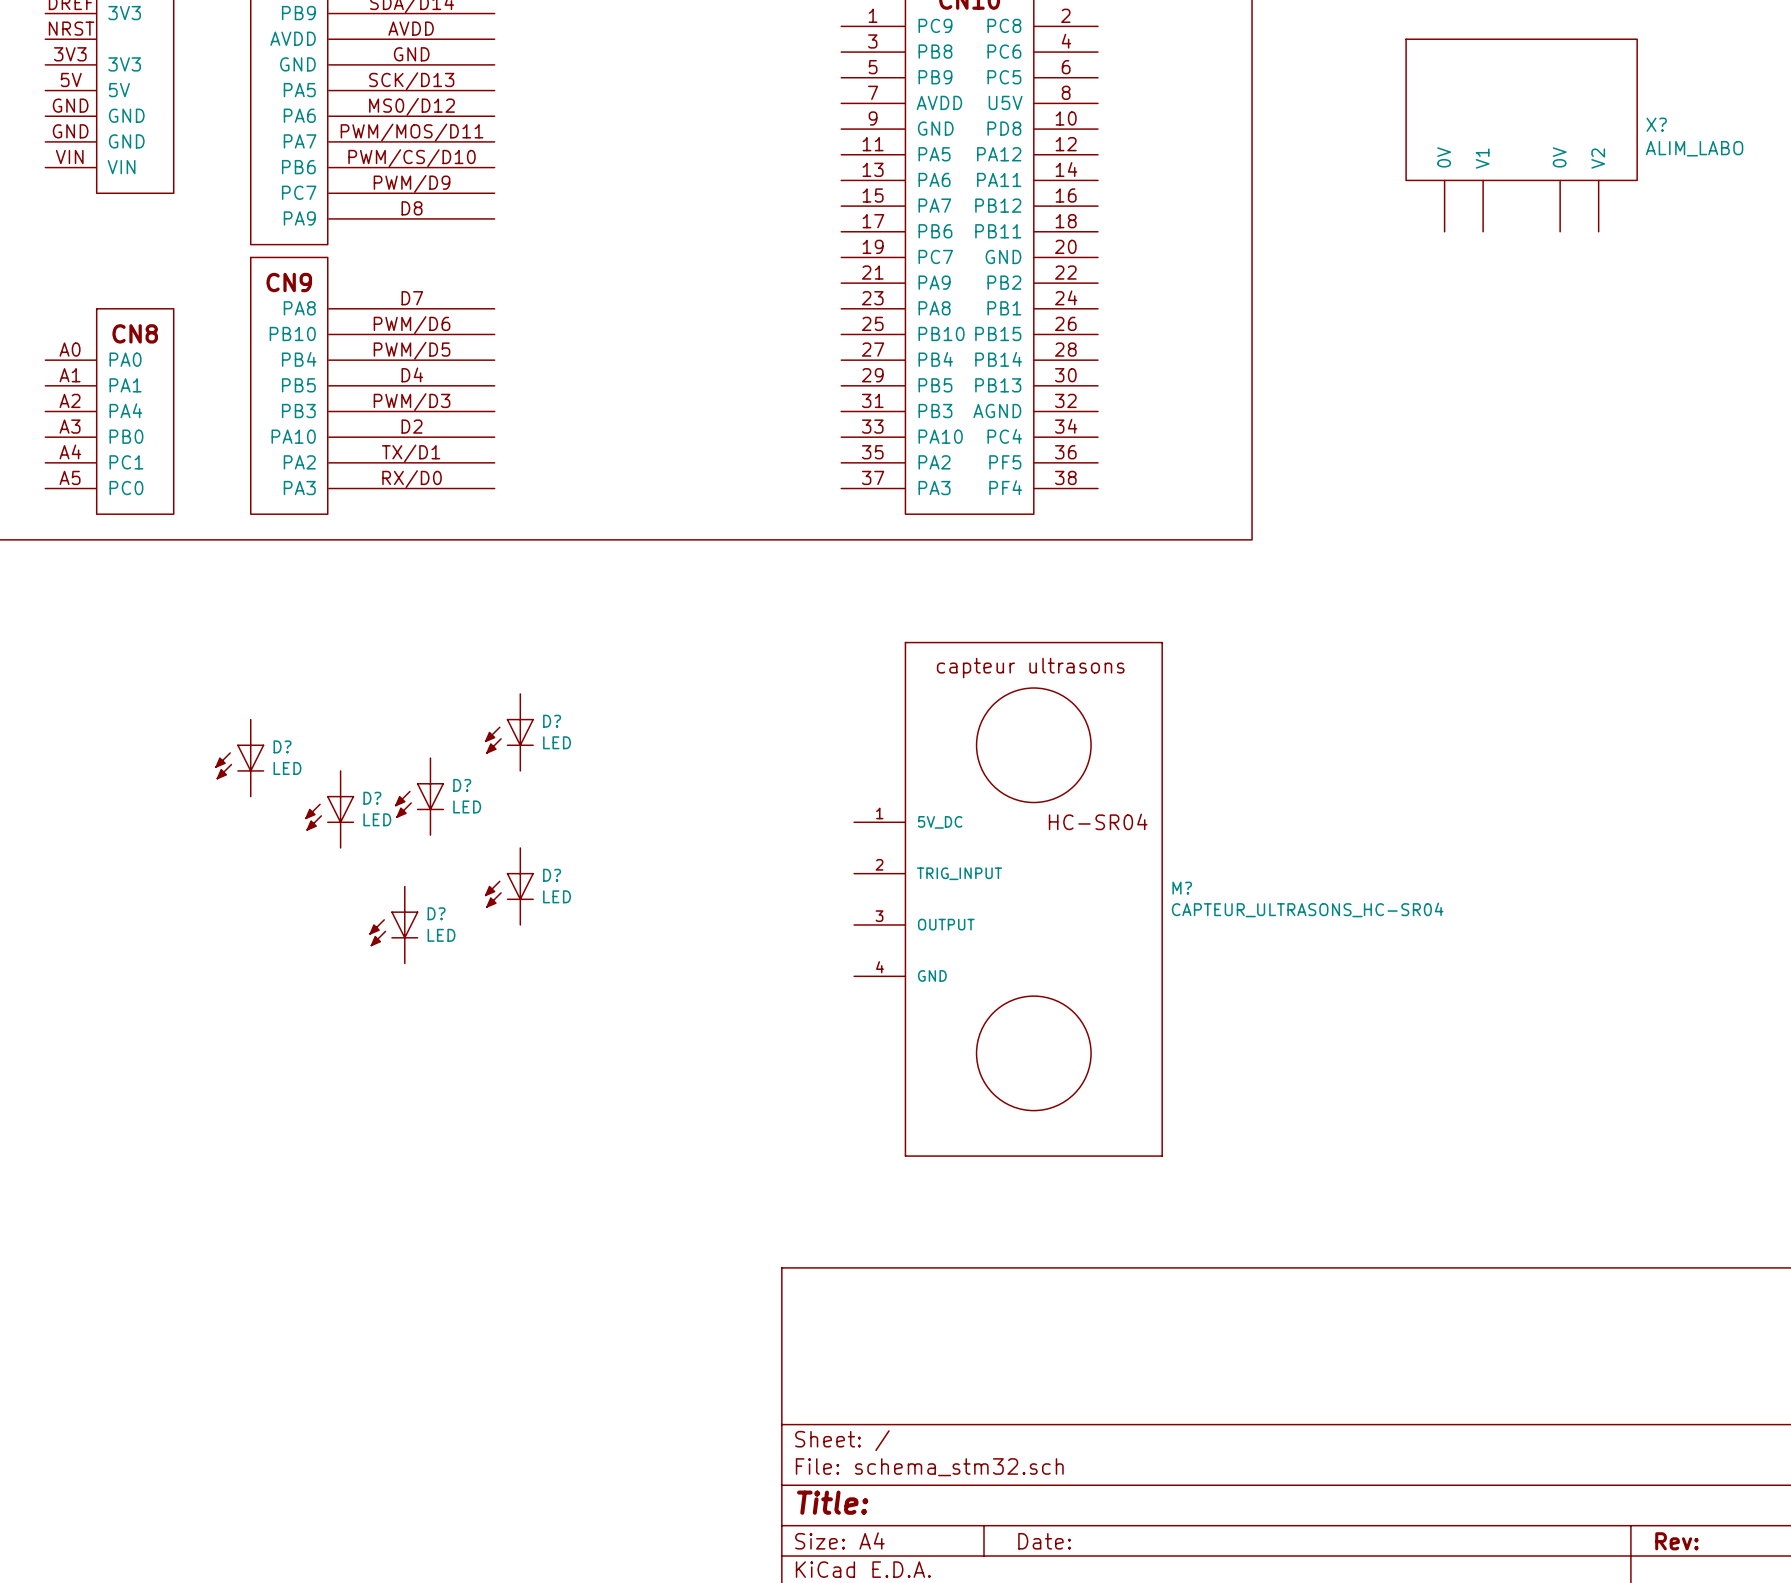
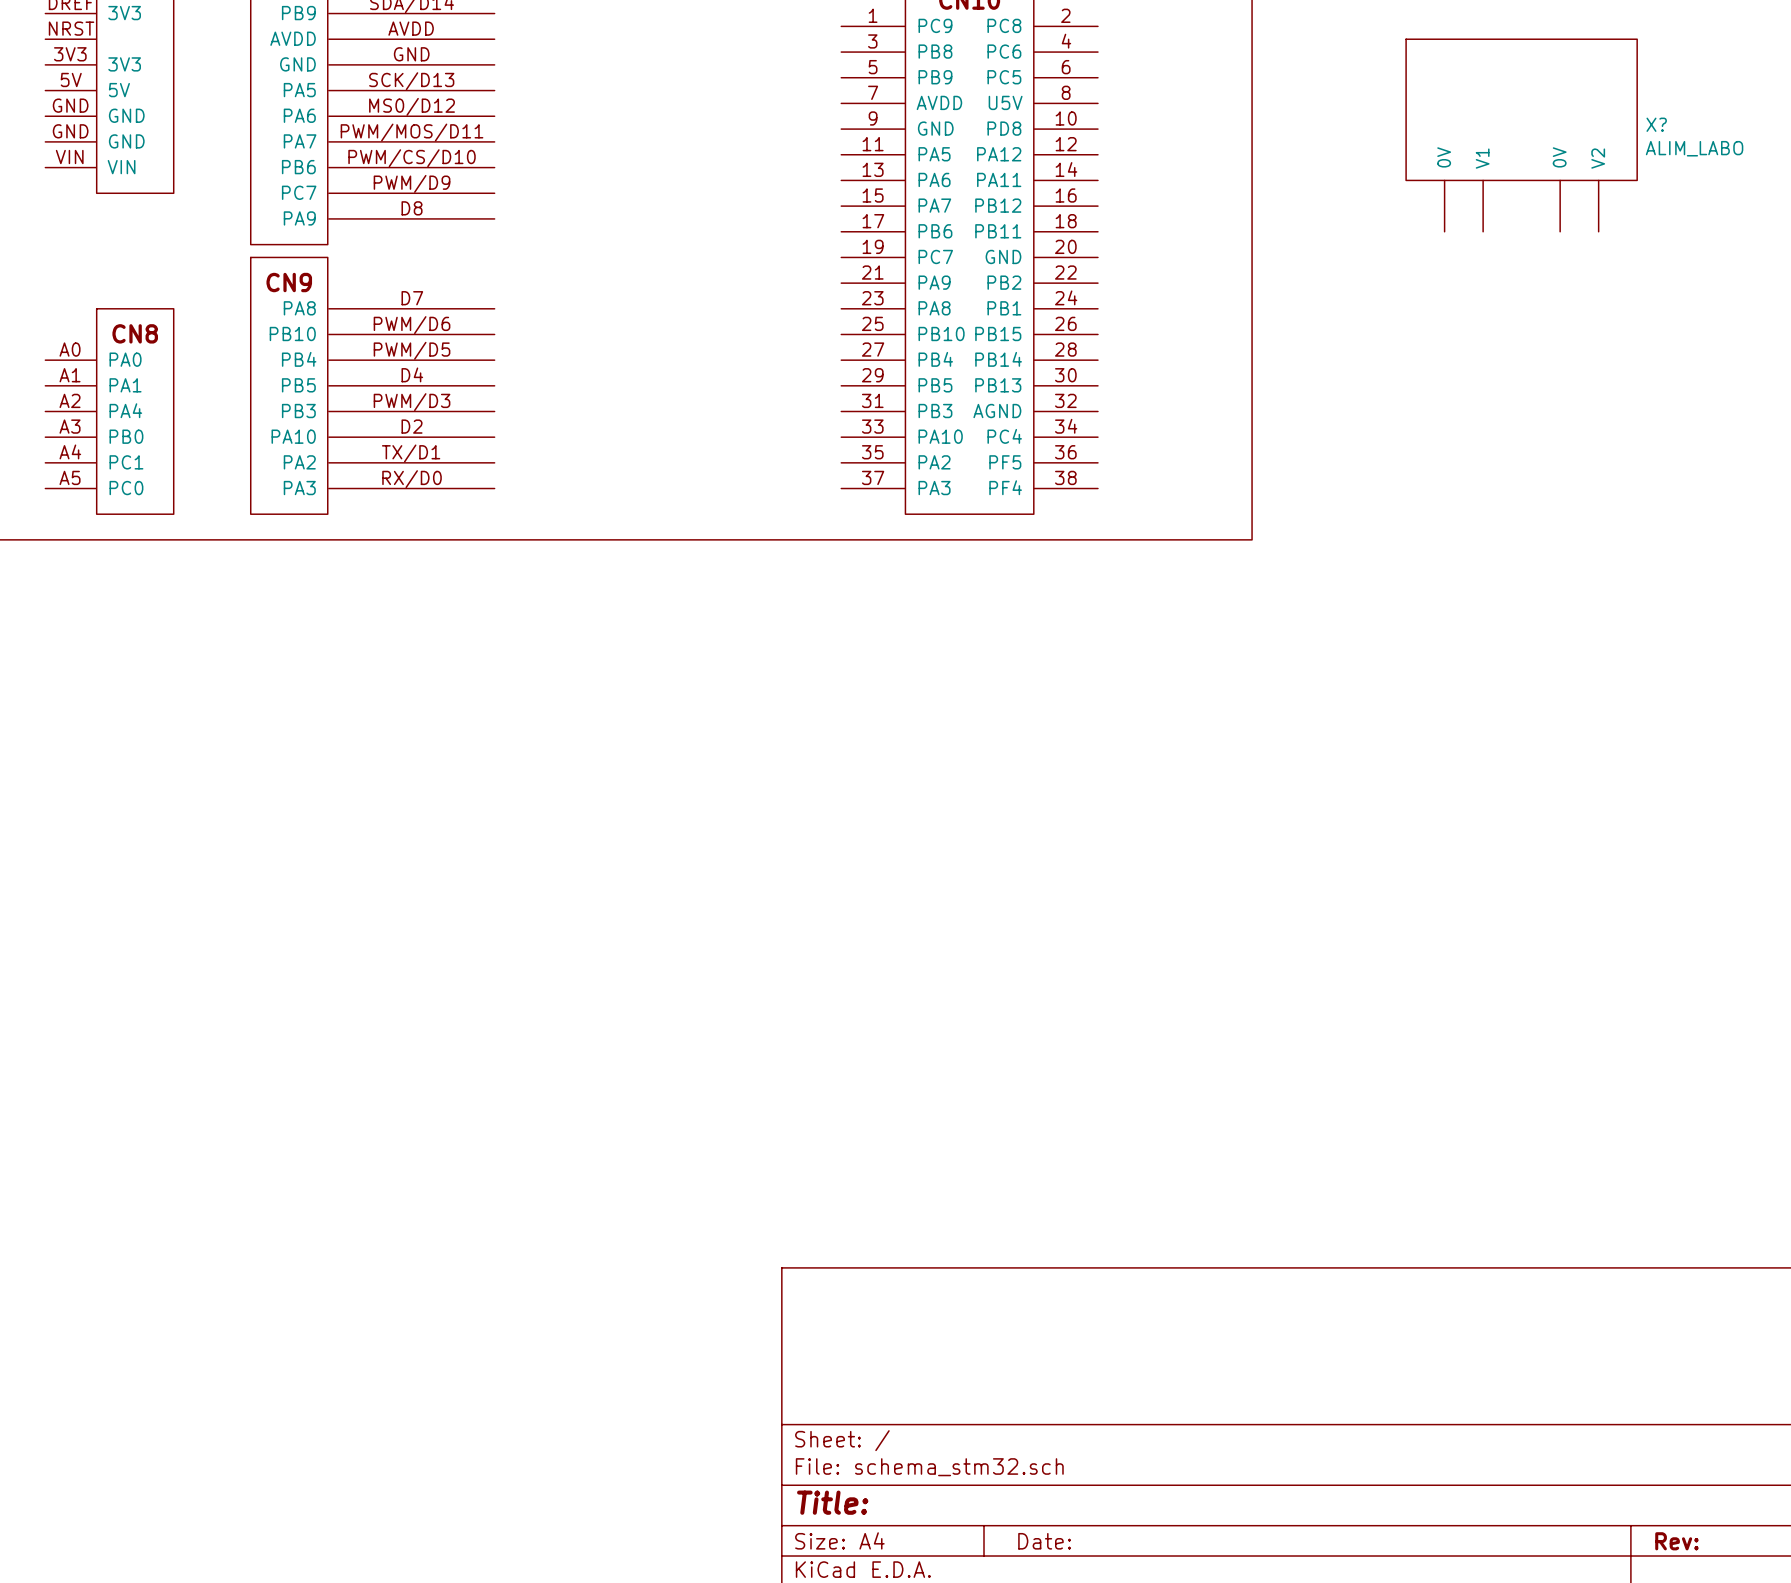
D?: LED (509, 732) -> none
D?: LED (239, 758) -> none
D?: LED (419, 796) -> none
D?: LED (329, 809) -> none
D?: LED (509, 886) -> none
M?: CAPTEUR_ULTRASONS_HC-SR04 (1008, 899) -> none
D?: LED (393, 924) -> none

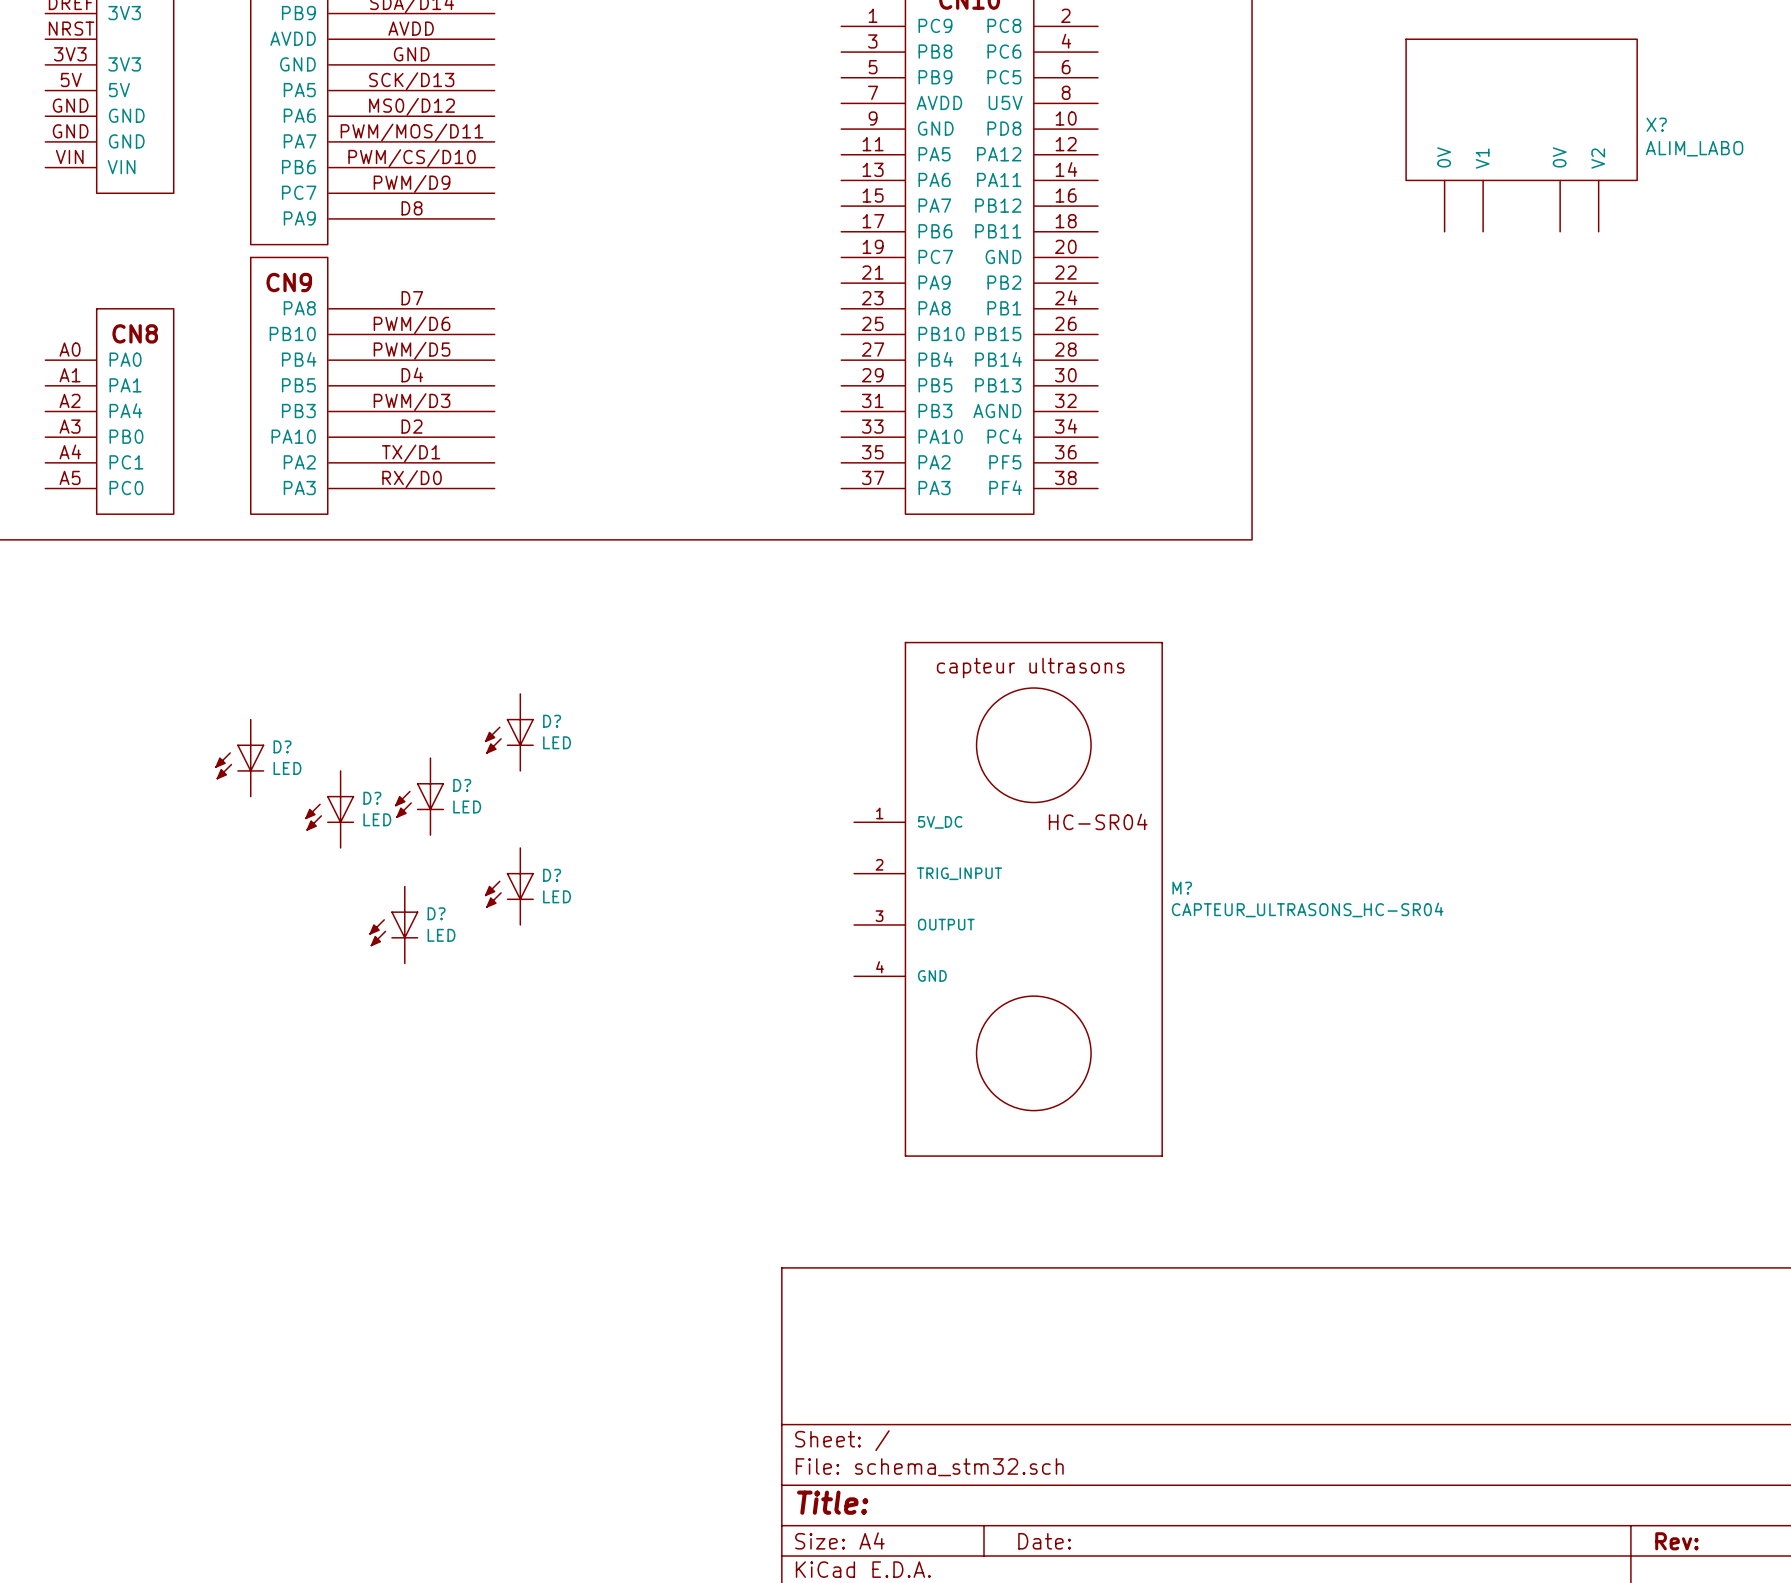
D?: none -> LED (509, 732)
D?: none -> LED (239, 758)
D?: none -> LED (419, 796)
D?: none -> LED (329, 809)
D?: none -> LED (509, 886)
M?: none -> CAPTEUR_ULTRASONS_HC-SR04 (1008, 899)
D?: none -> LED (393, 924)

